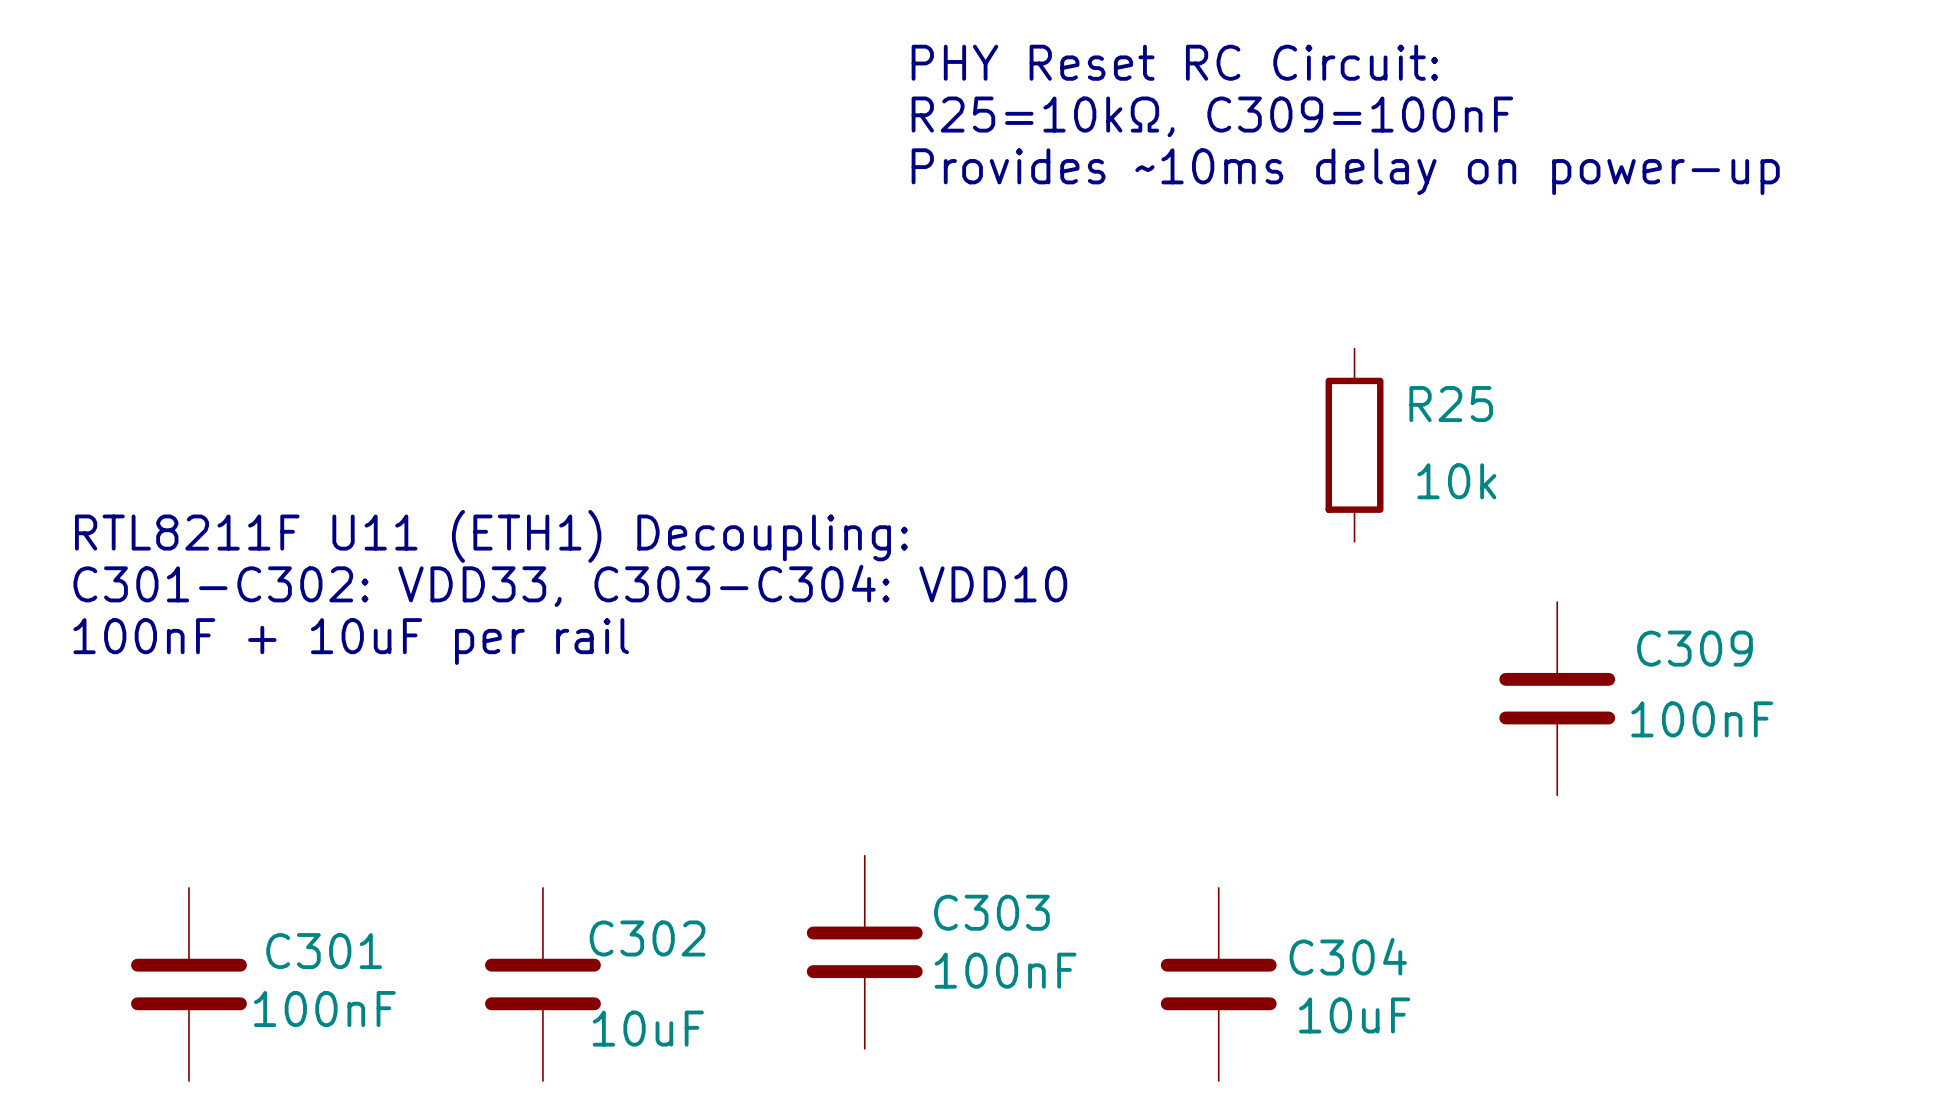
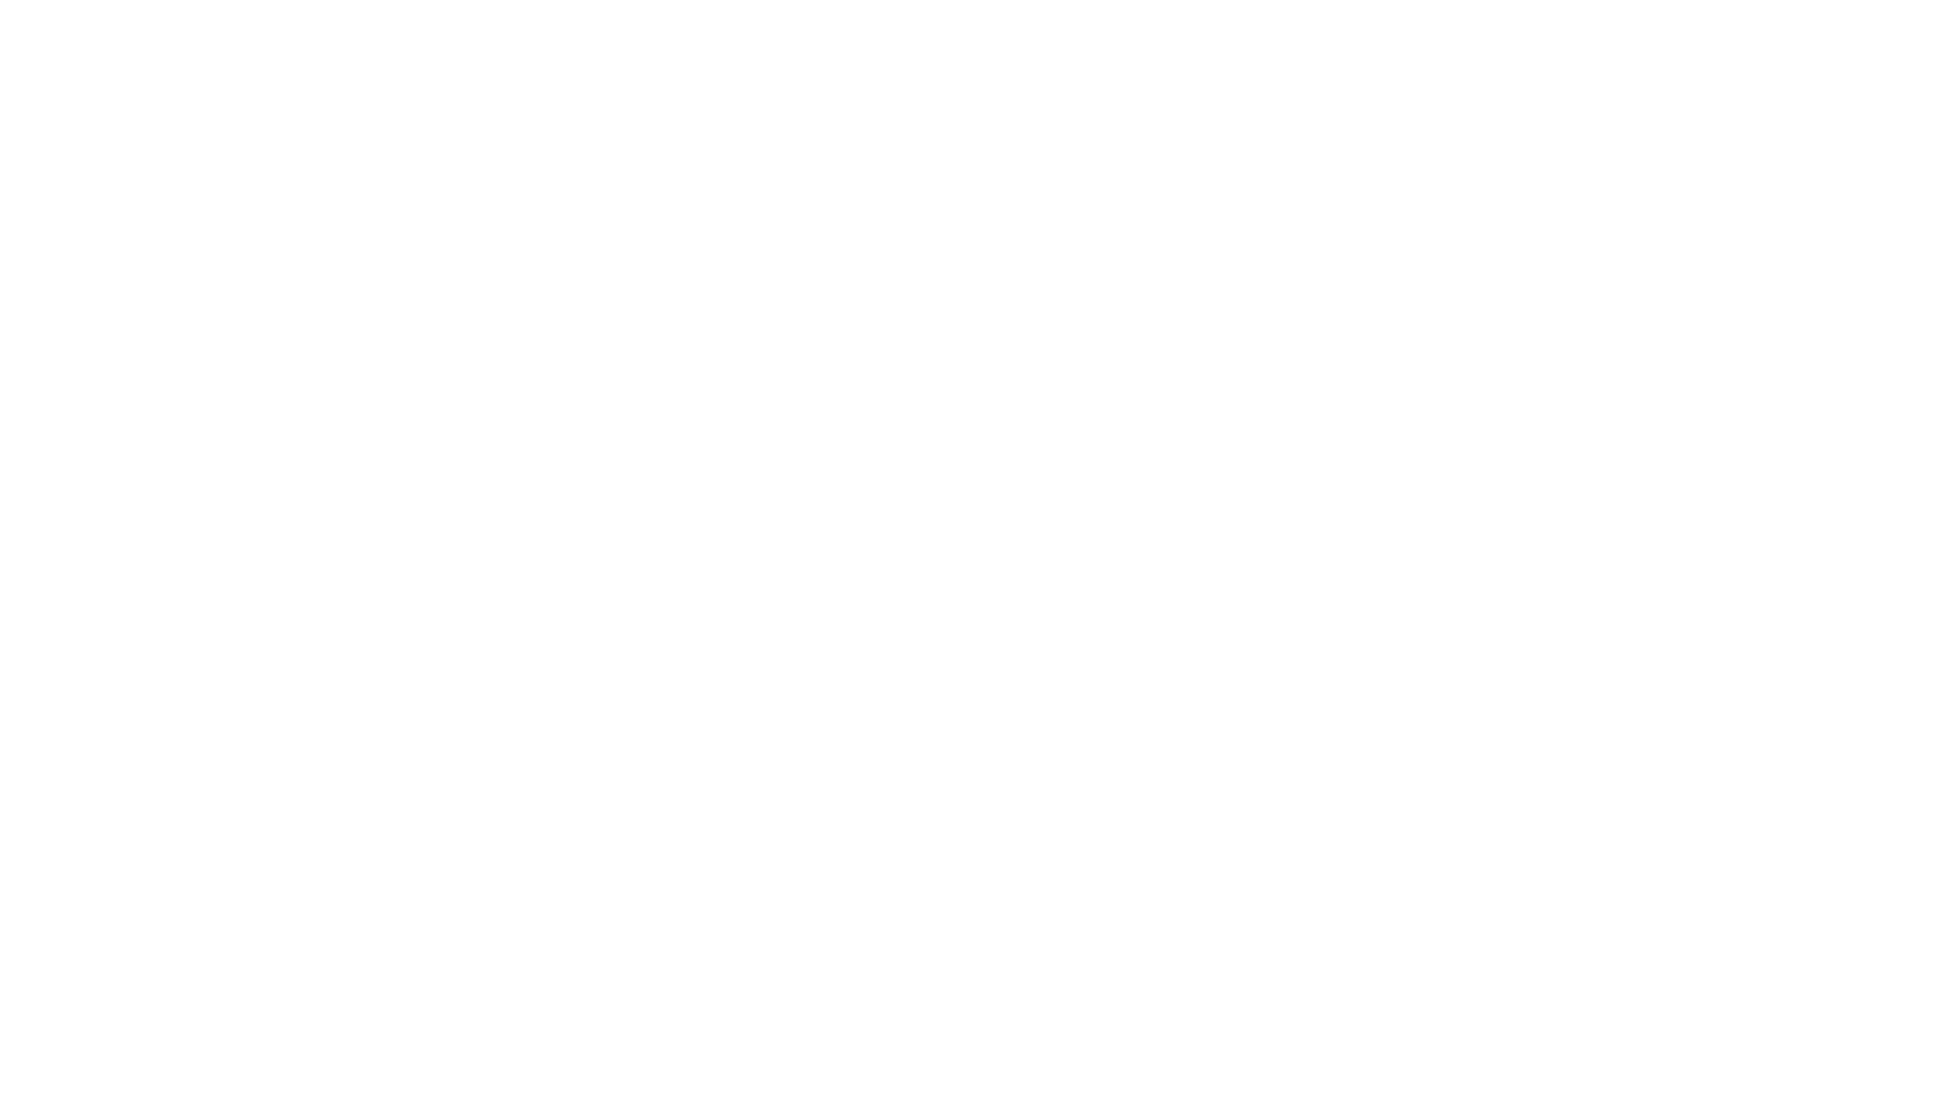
text: PHY Reset RC Circuit: (1174, 62) -> none
text: R25=10kΩ, C309=100nF (1212, 116) -> none
text: Provides ~10ms delay on power-up (1345, 171) -> none
R25: 10k (1354, 445) -> none
text: RTL8211F U11 (ETH1) Decoupling: (491, 536) -> none
text: C301-C302: VDD33, C303-C304: VDD10 (570, 585) -> none
text: 100nF + 10uF per rail (351, 641) -> none
C309: 100nF (1557, 698) -> none
C303: 100nF (864, 952) -> none
C301: 100nF (188, 984) -> none
C302: 10uF (542, 984) -> none
C304: 10uF (1218, 984) -> none

